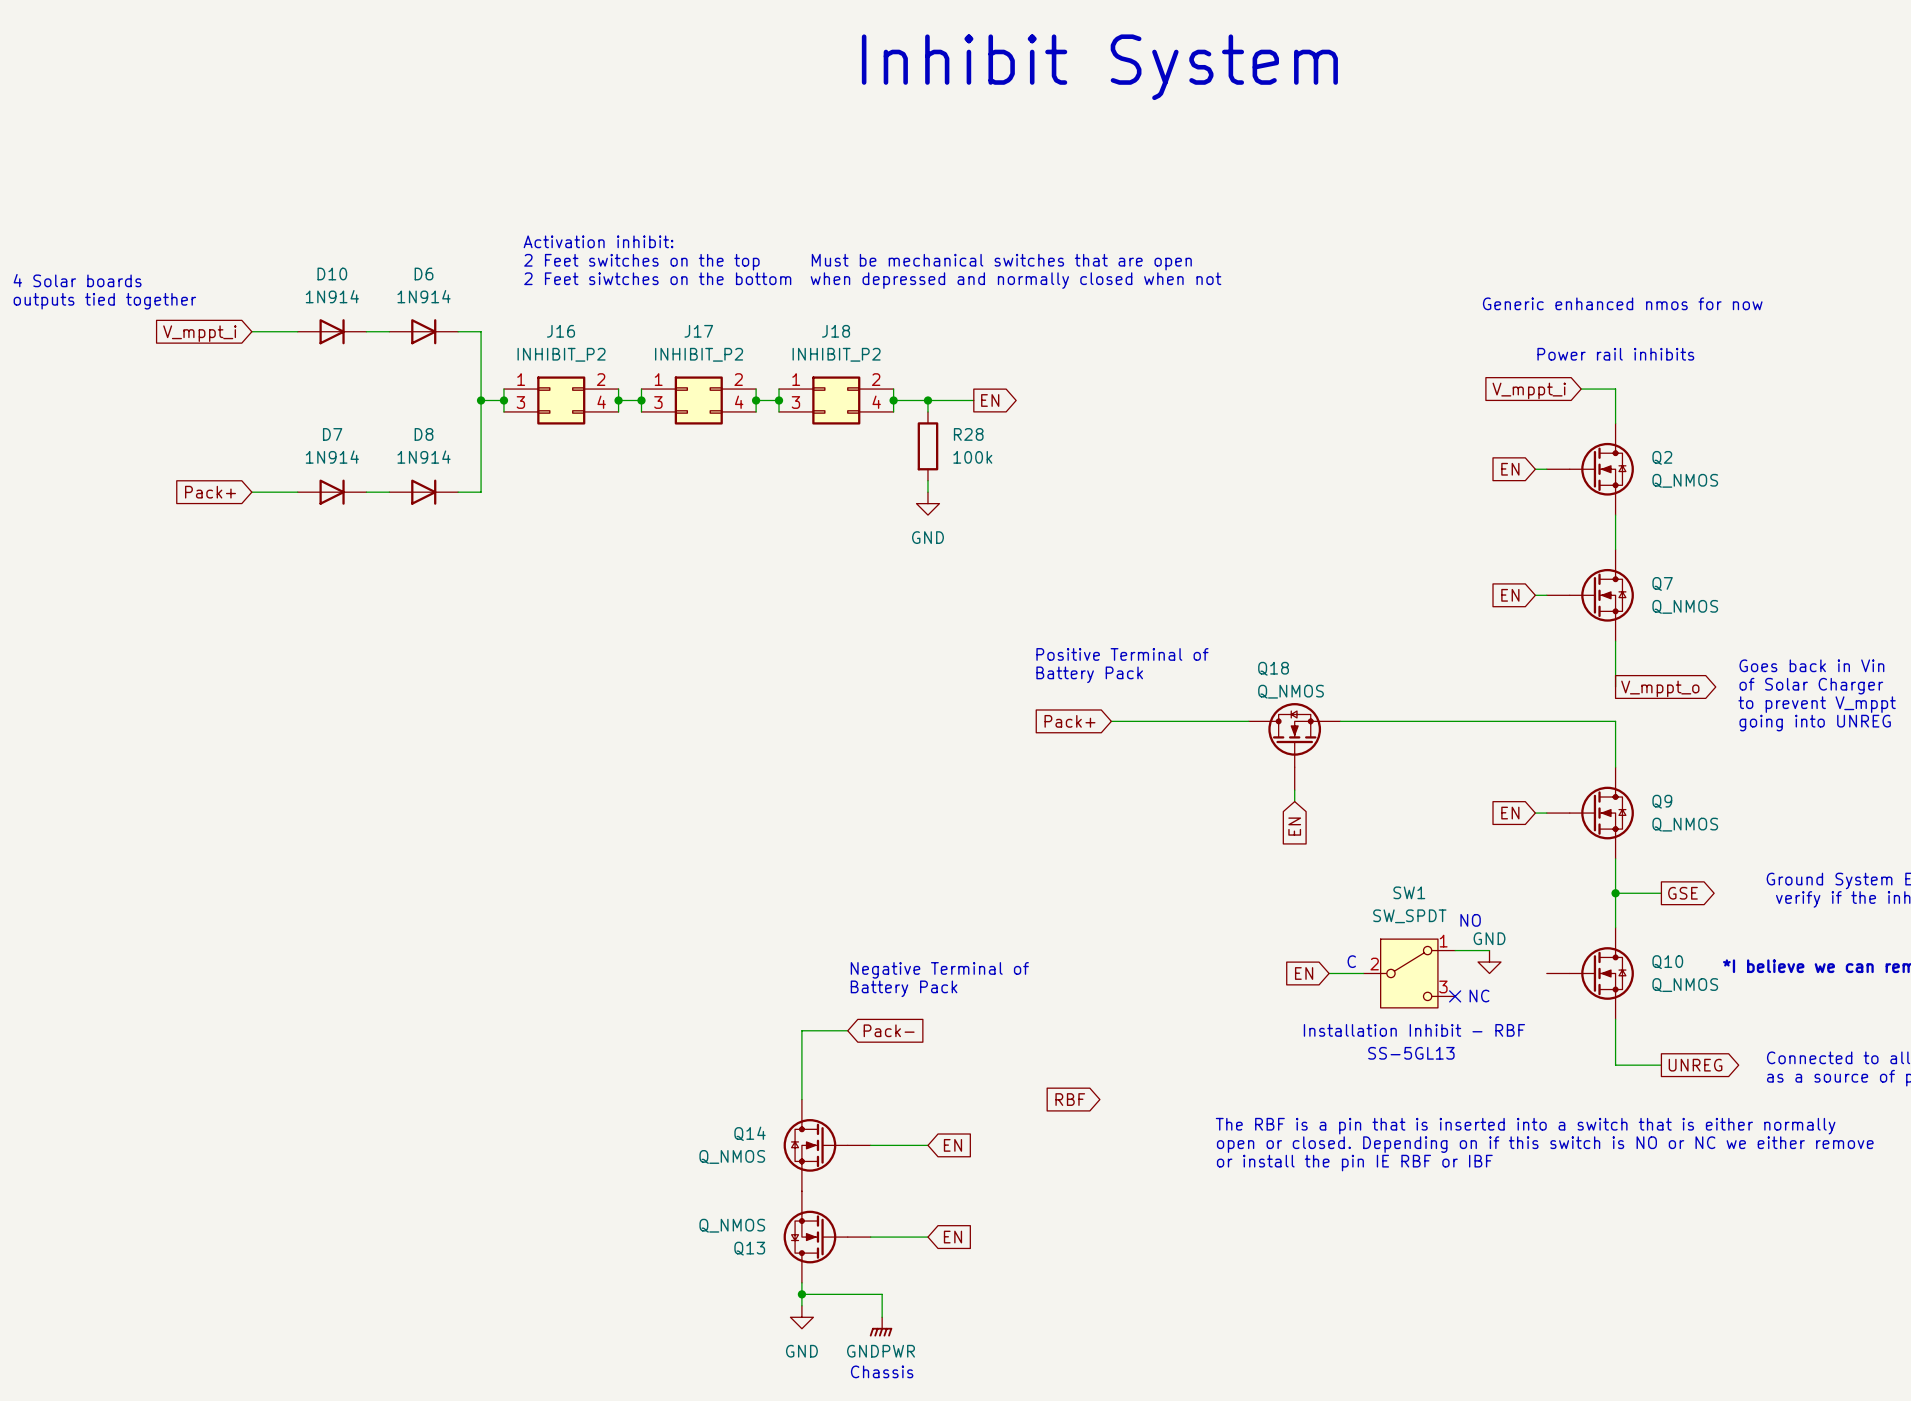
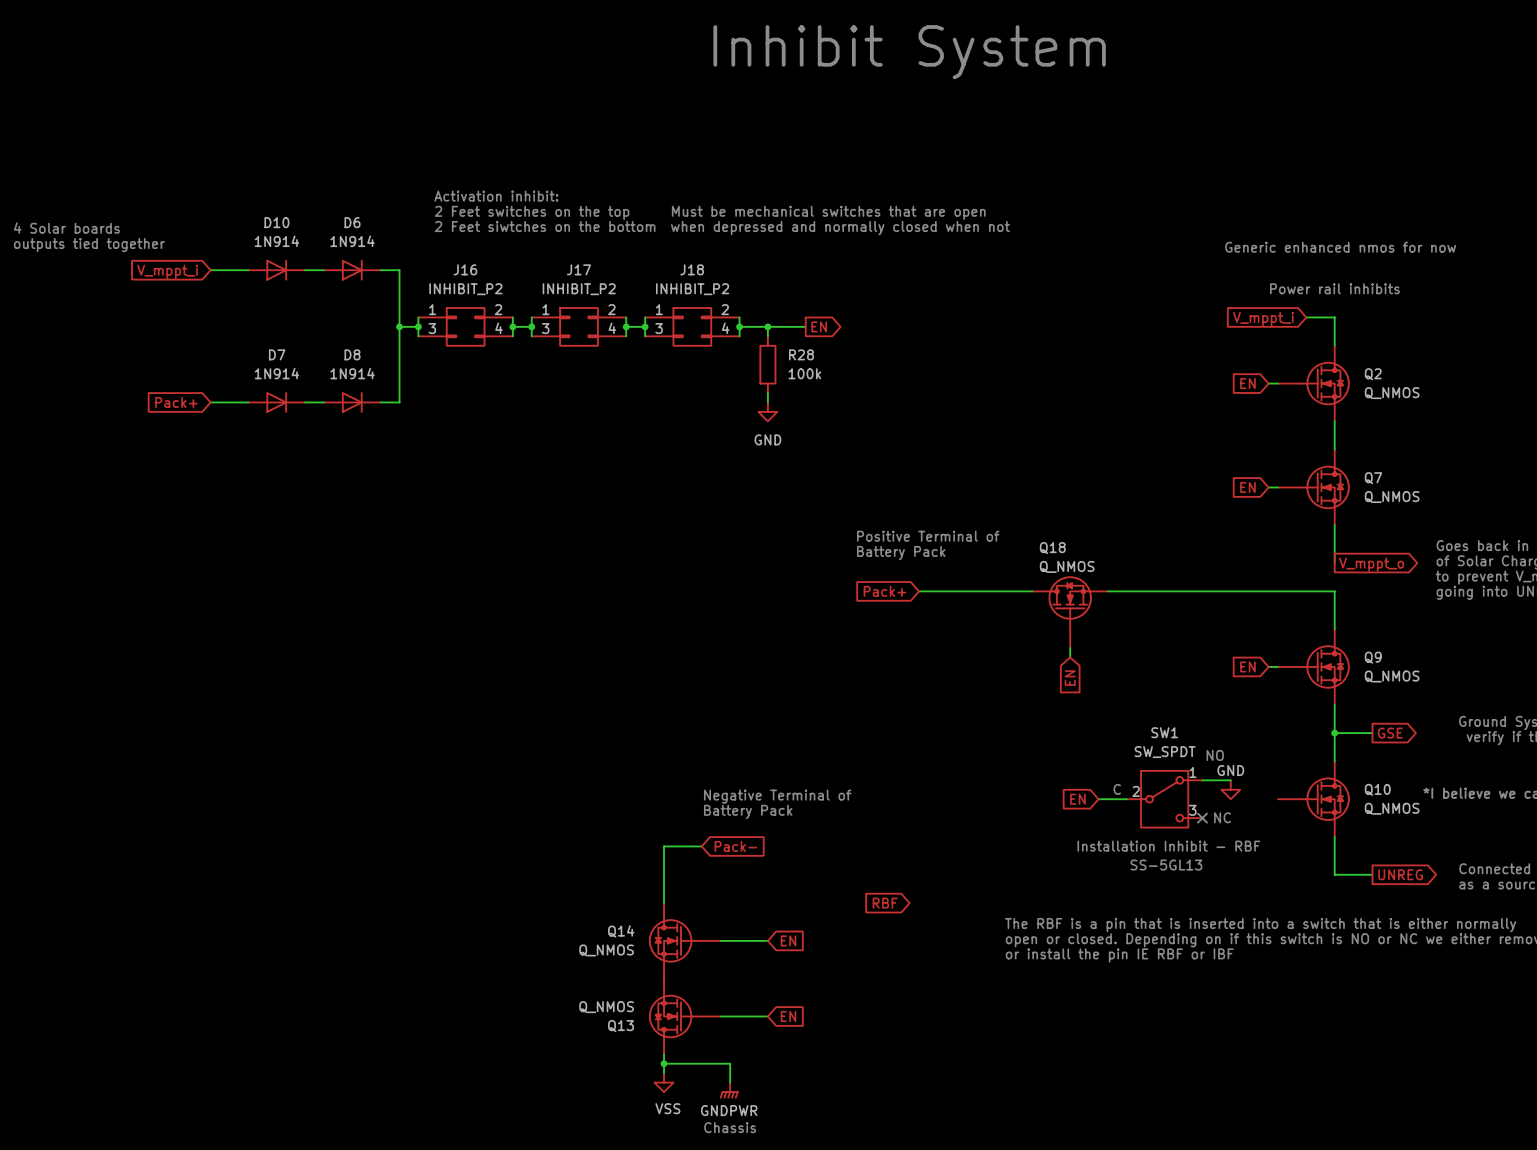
power symbol: GND (801, 1317) -> VSS (664, 1082)

